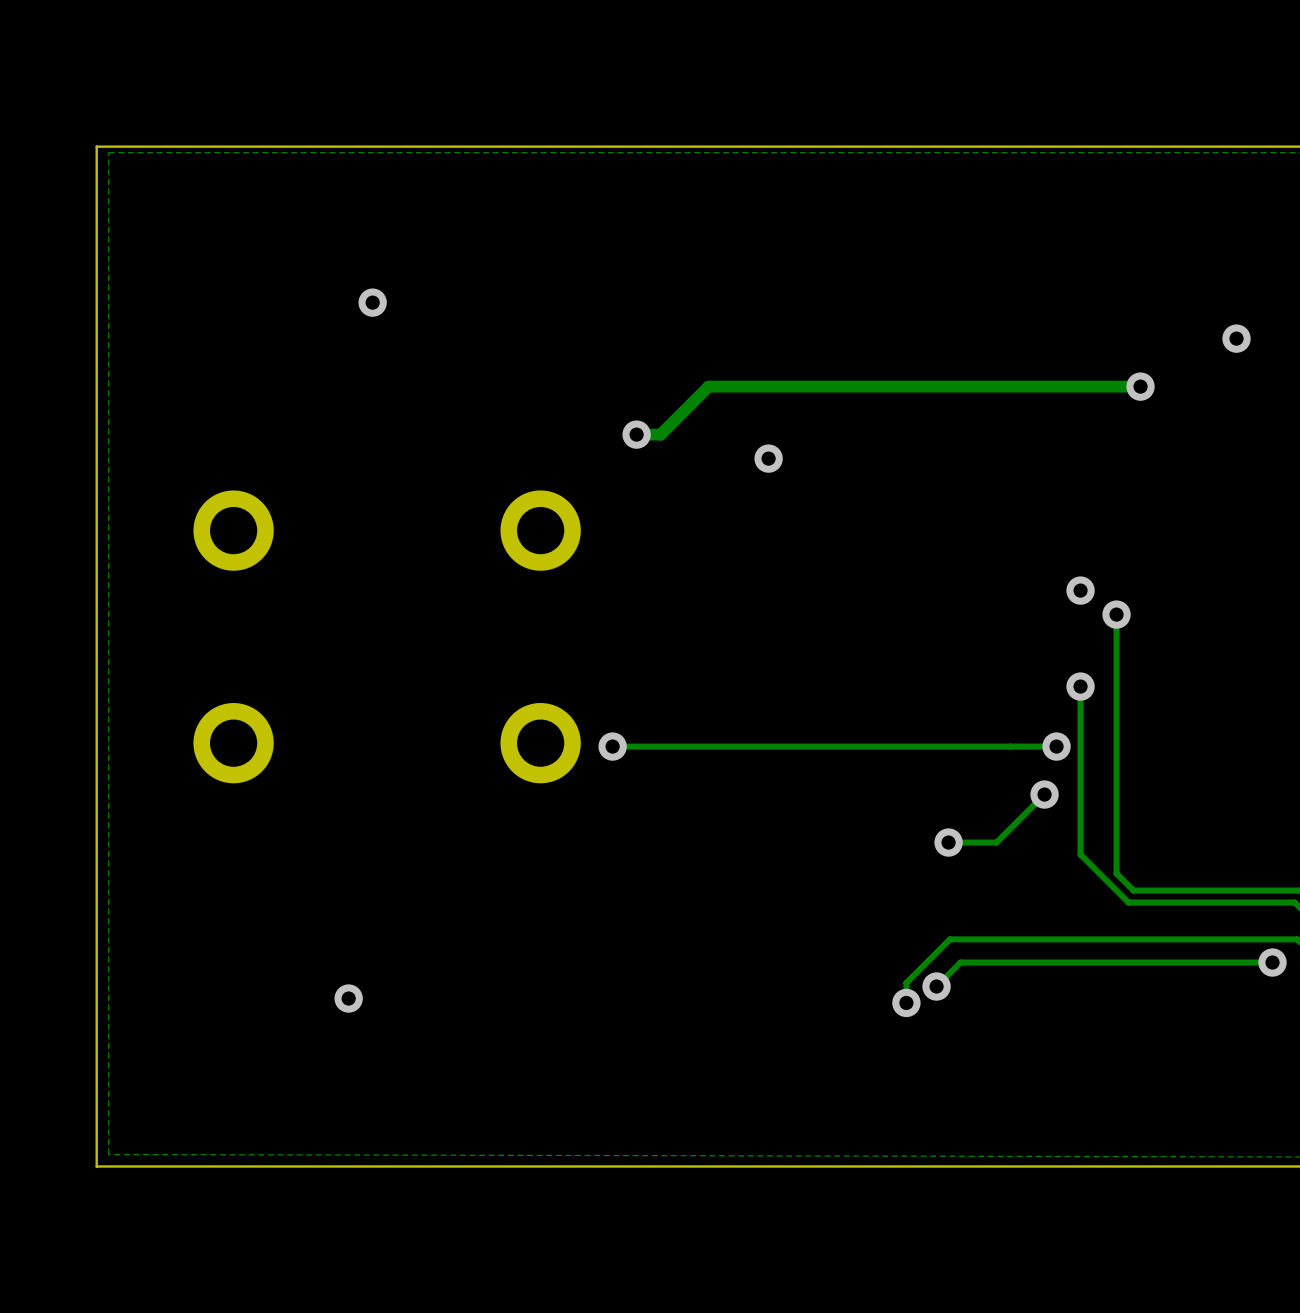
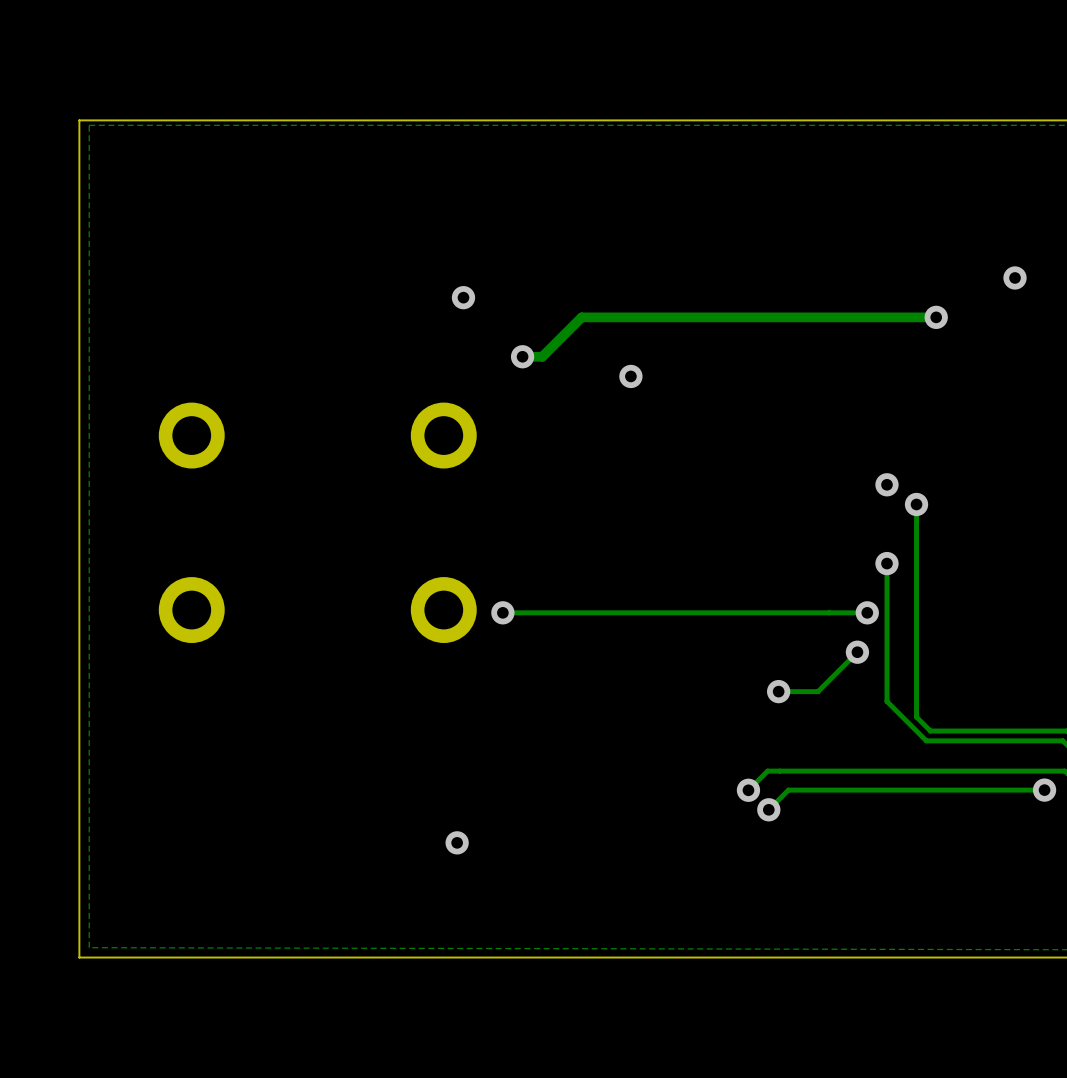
via position: (372, 302) -> (463, 297)
track: (949, 939) (906, 982) (906, 1002) -> (779, 771) (767, 771) (748, 790)
via: (348, 998) -> none
via position: (906, 1002) -> (748, 790)
via: none -> (457, 842)

